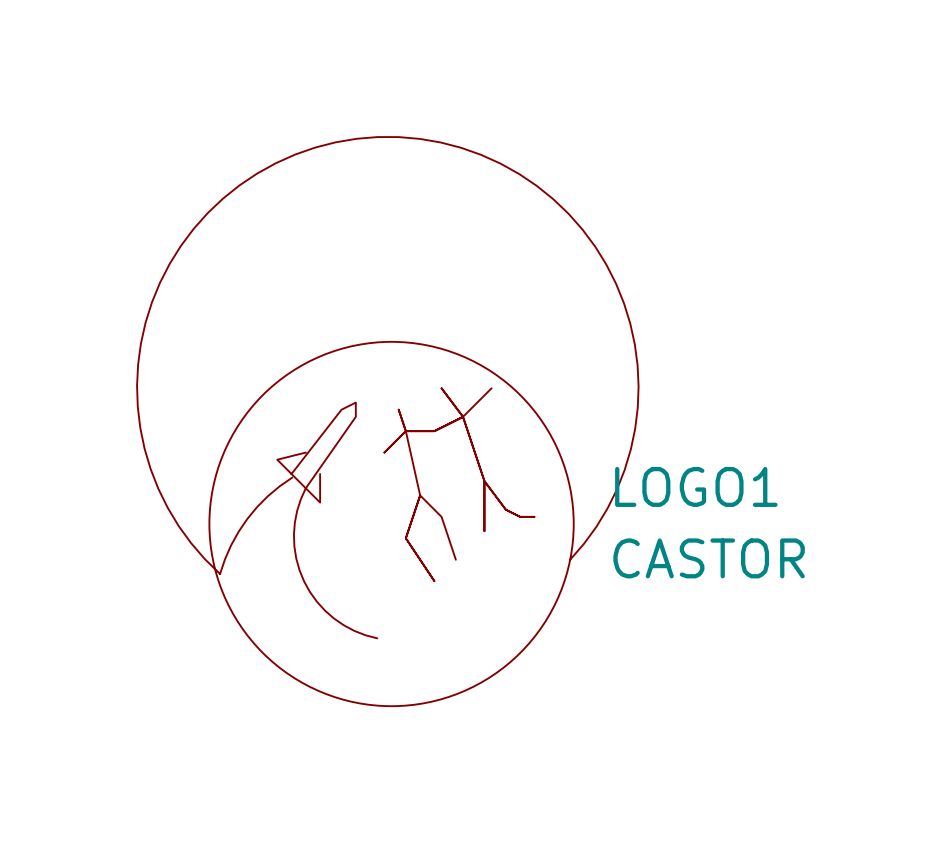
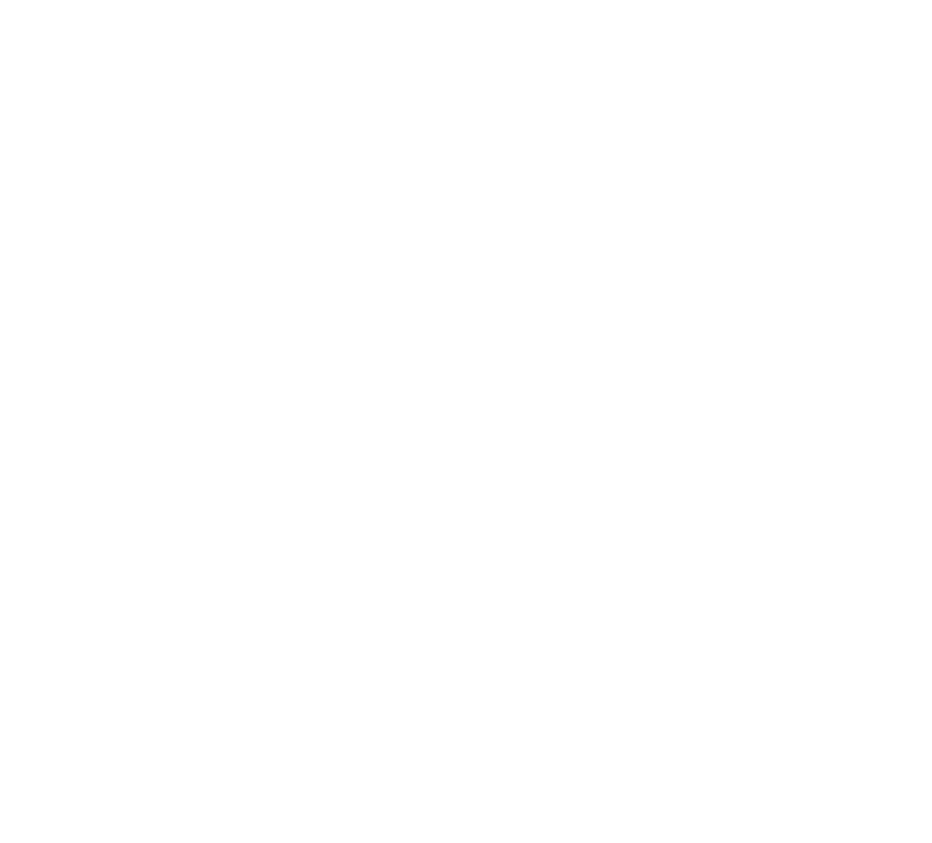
LOGO1: CASTOR (387, 421) -> none

